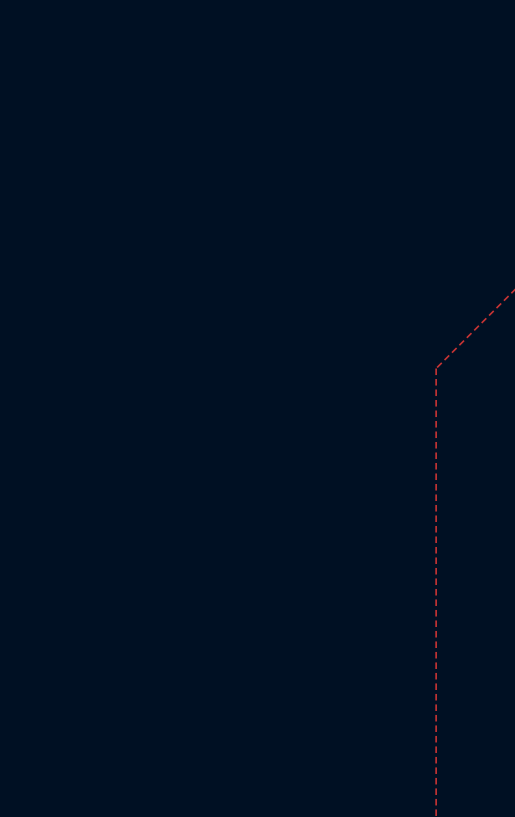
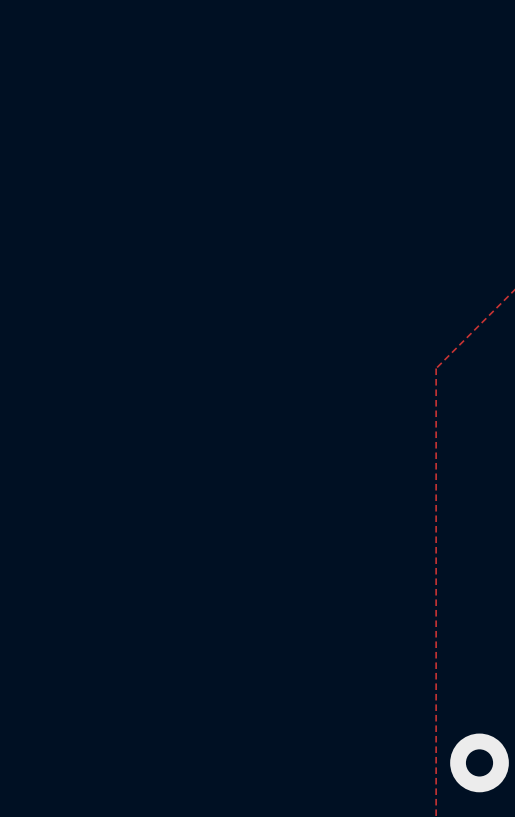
via: none -> (479, 762)

